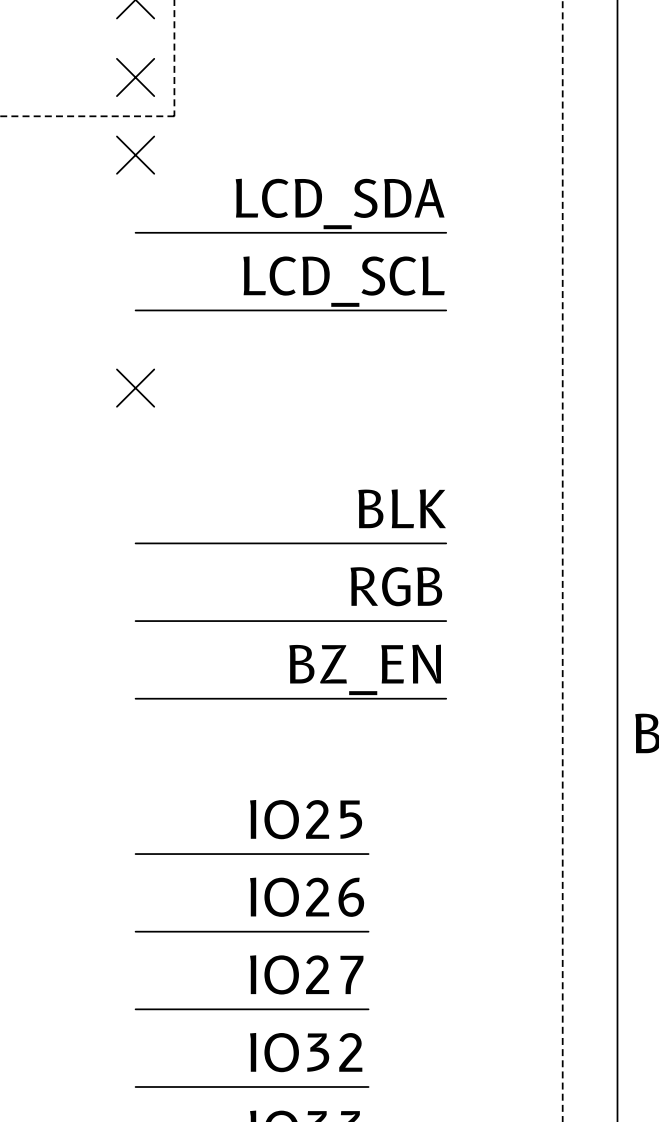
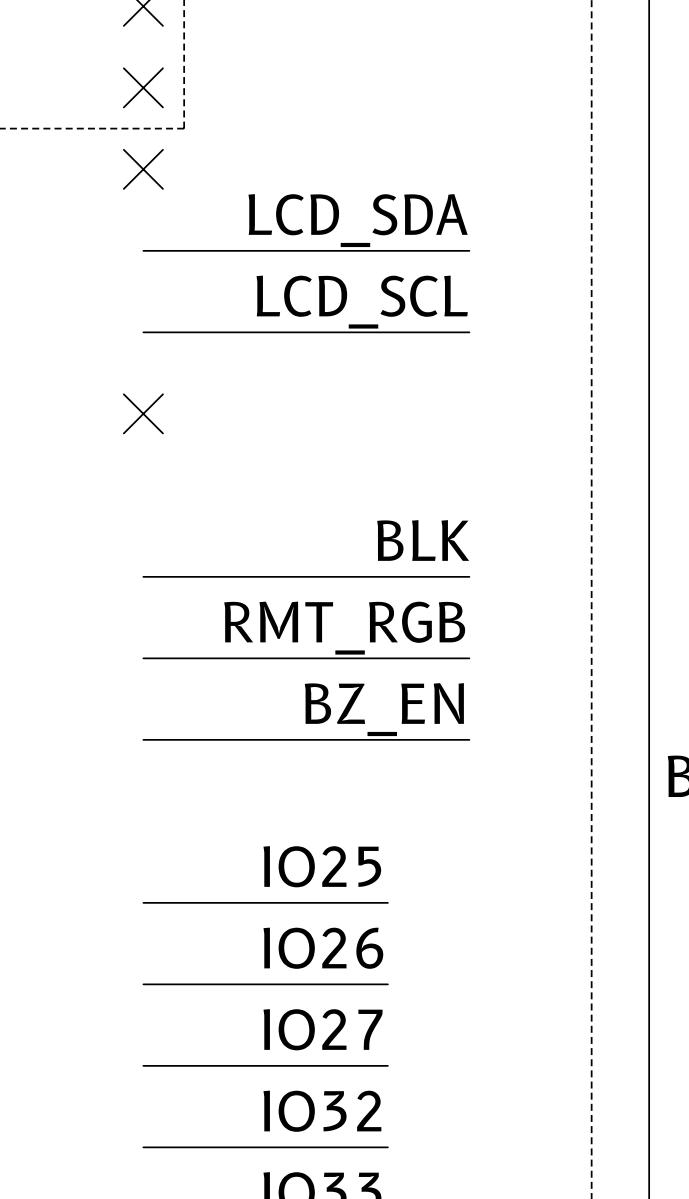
label: RGB (396, 586) -> RMT_RGB (344, 628)

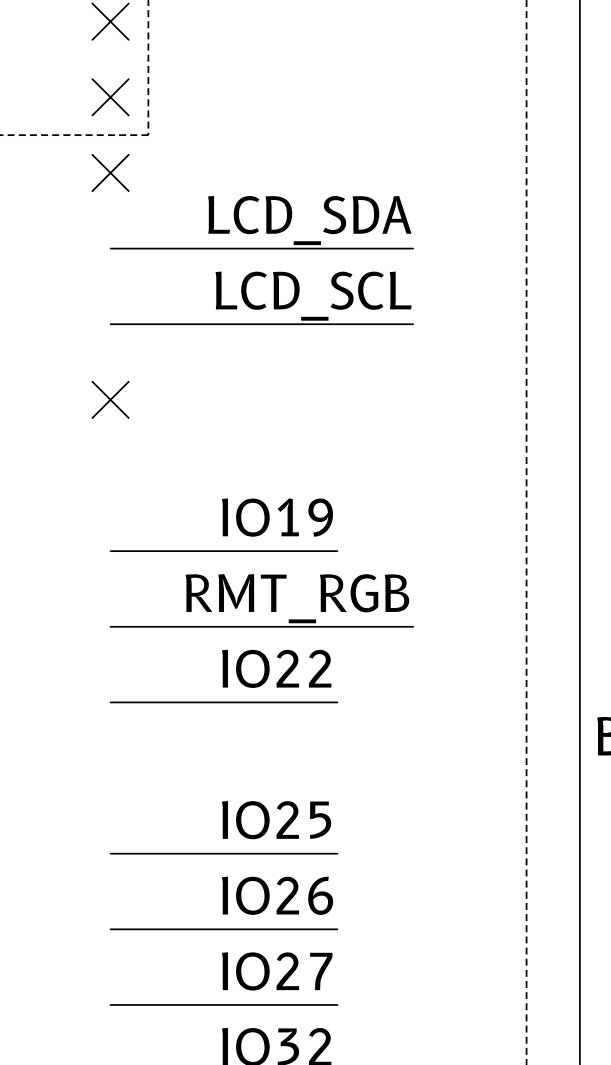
label: none -> IO19 (277, 517)
label: BLK (423, 540) -> none
wire: (387, 576) (469, 576) -> none
label: none -> IO22 (276, 668)
label: BZ_EN (384, 709) -> none
wire: (387, 739) (469, 739) -> none

